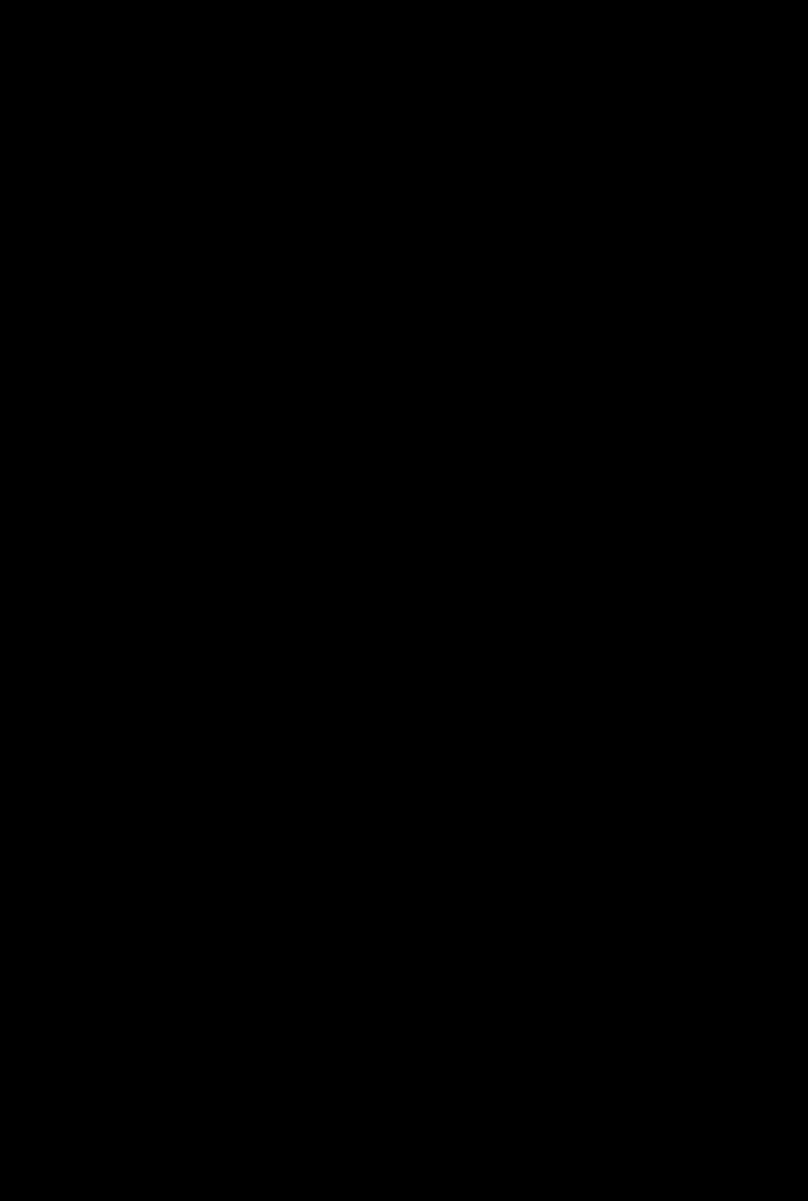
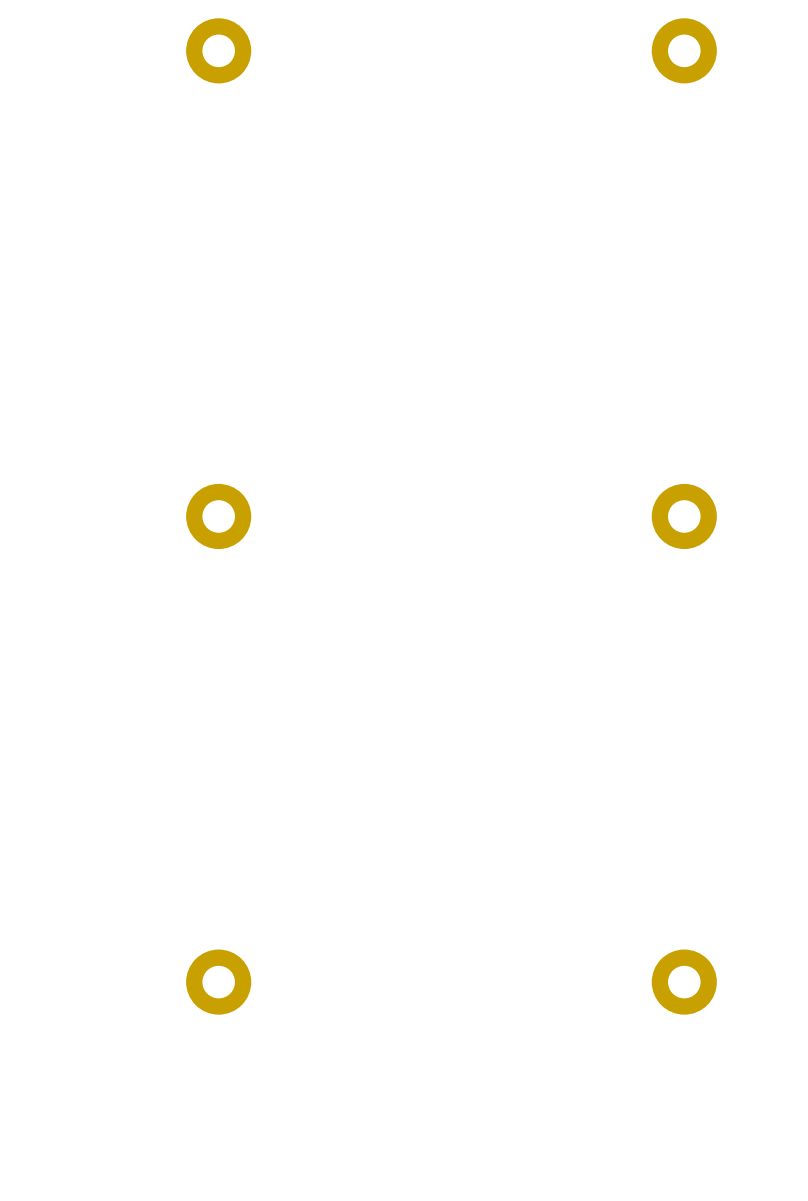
part: none -> (218, 50)
part: none -> (684, 50)
part: none -> (218, 516)
part: none -> (684, 516)
part: none -> (218, 982)
part: none -> (684, 982)

